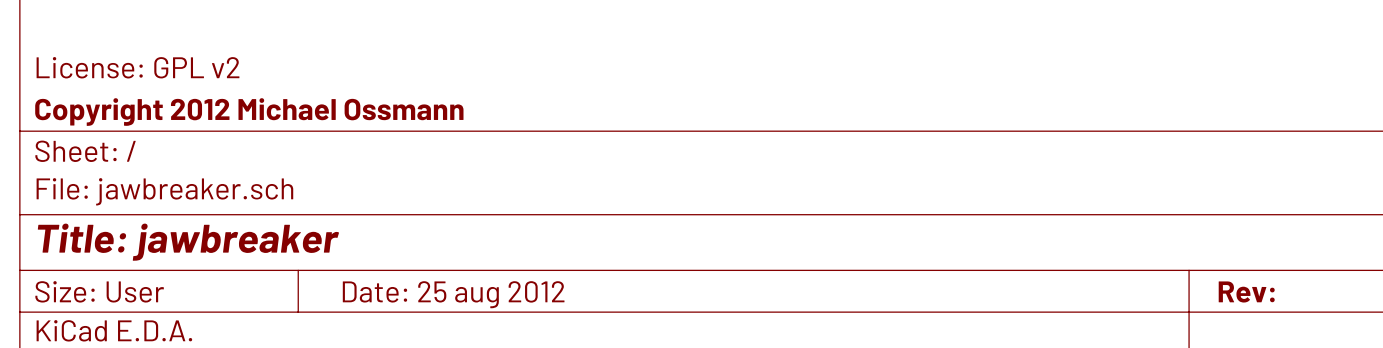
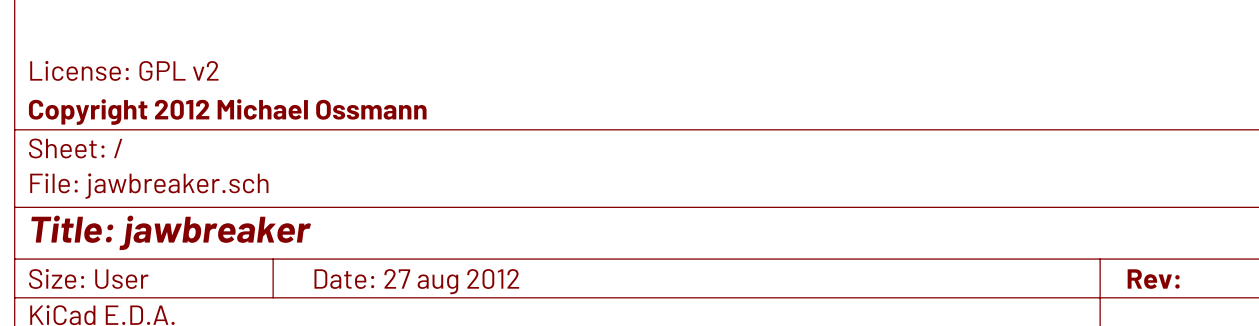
title block: Date: 25 aug 2012 (453, 294) -> Date: 27 aug 2012 (416, 281)

